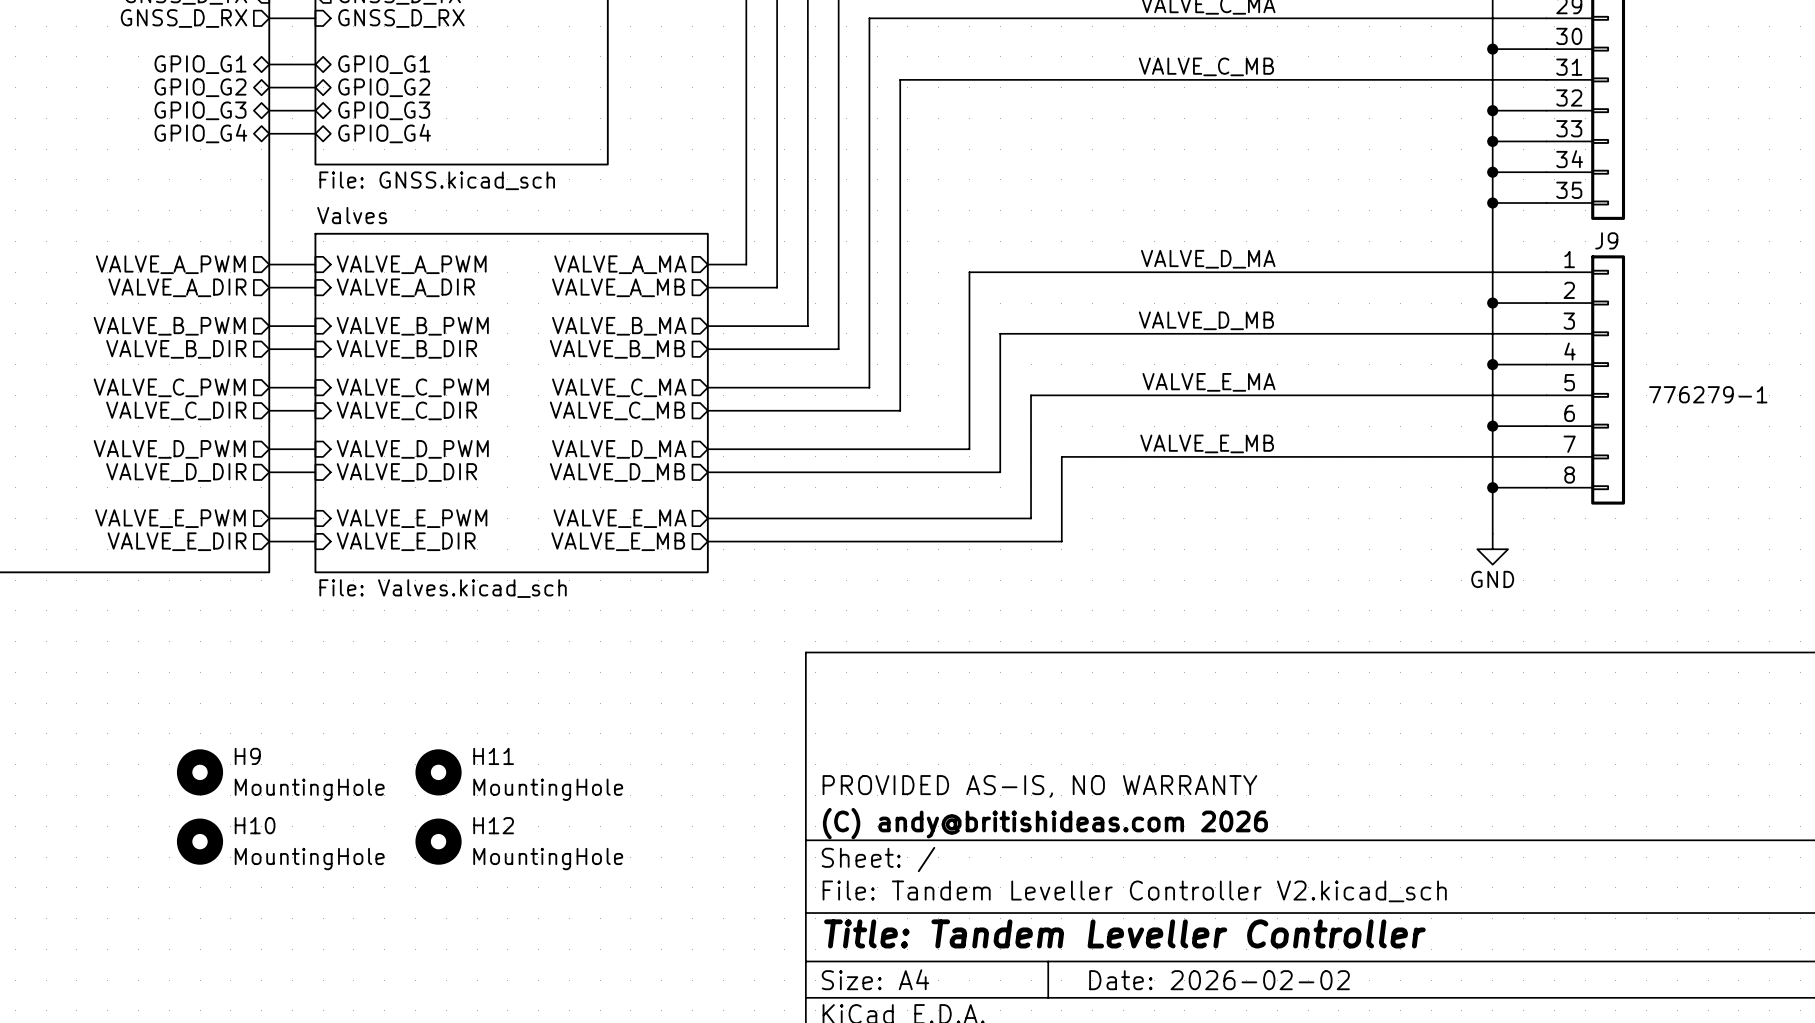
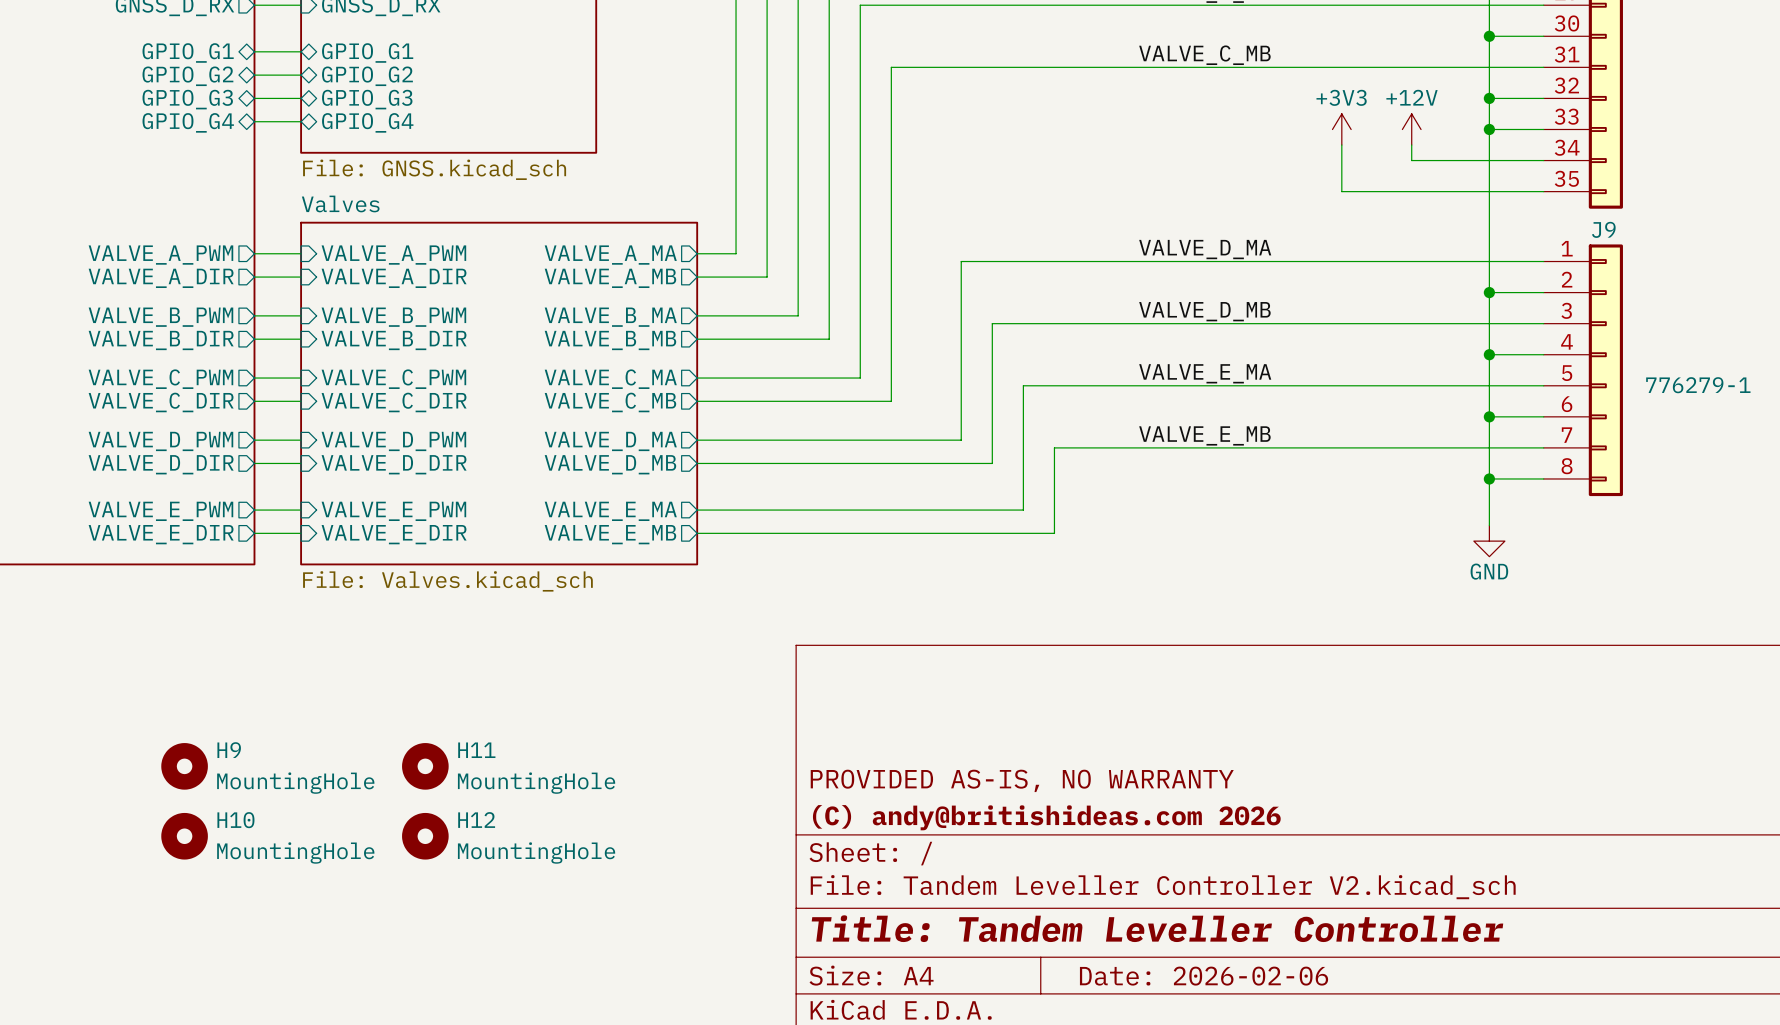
power symbol: none -> +3V3 (1341, 129)
power symbol: none -> +12V (1411, 129)
wire: none -> (1341, 145) (1341, 191) (1489, 191)
wire: none -> (1411, 145) (1411, 160) (1489, 160)
junction: (1492, 172) -> none
junction: (1492, 202) -> none
title block: Date: 2026-02-02 (1219, 980) -> Date: 2026-02-06 (1204, 976)

